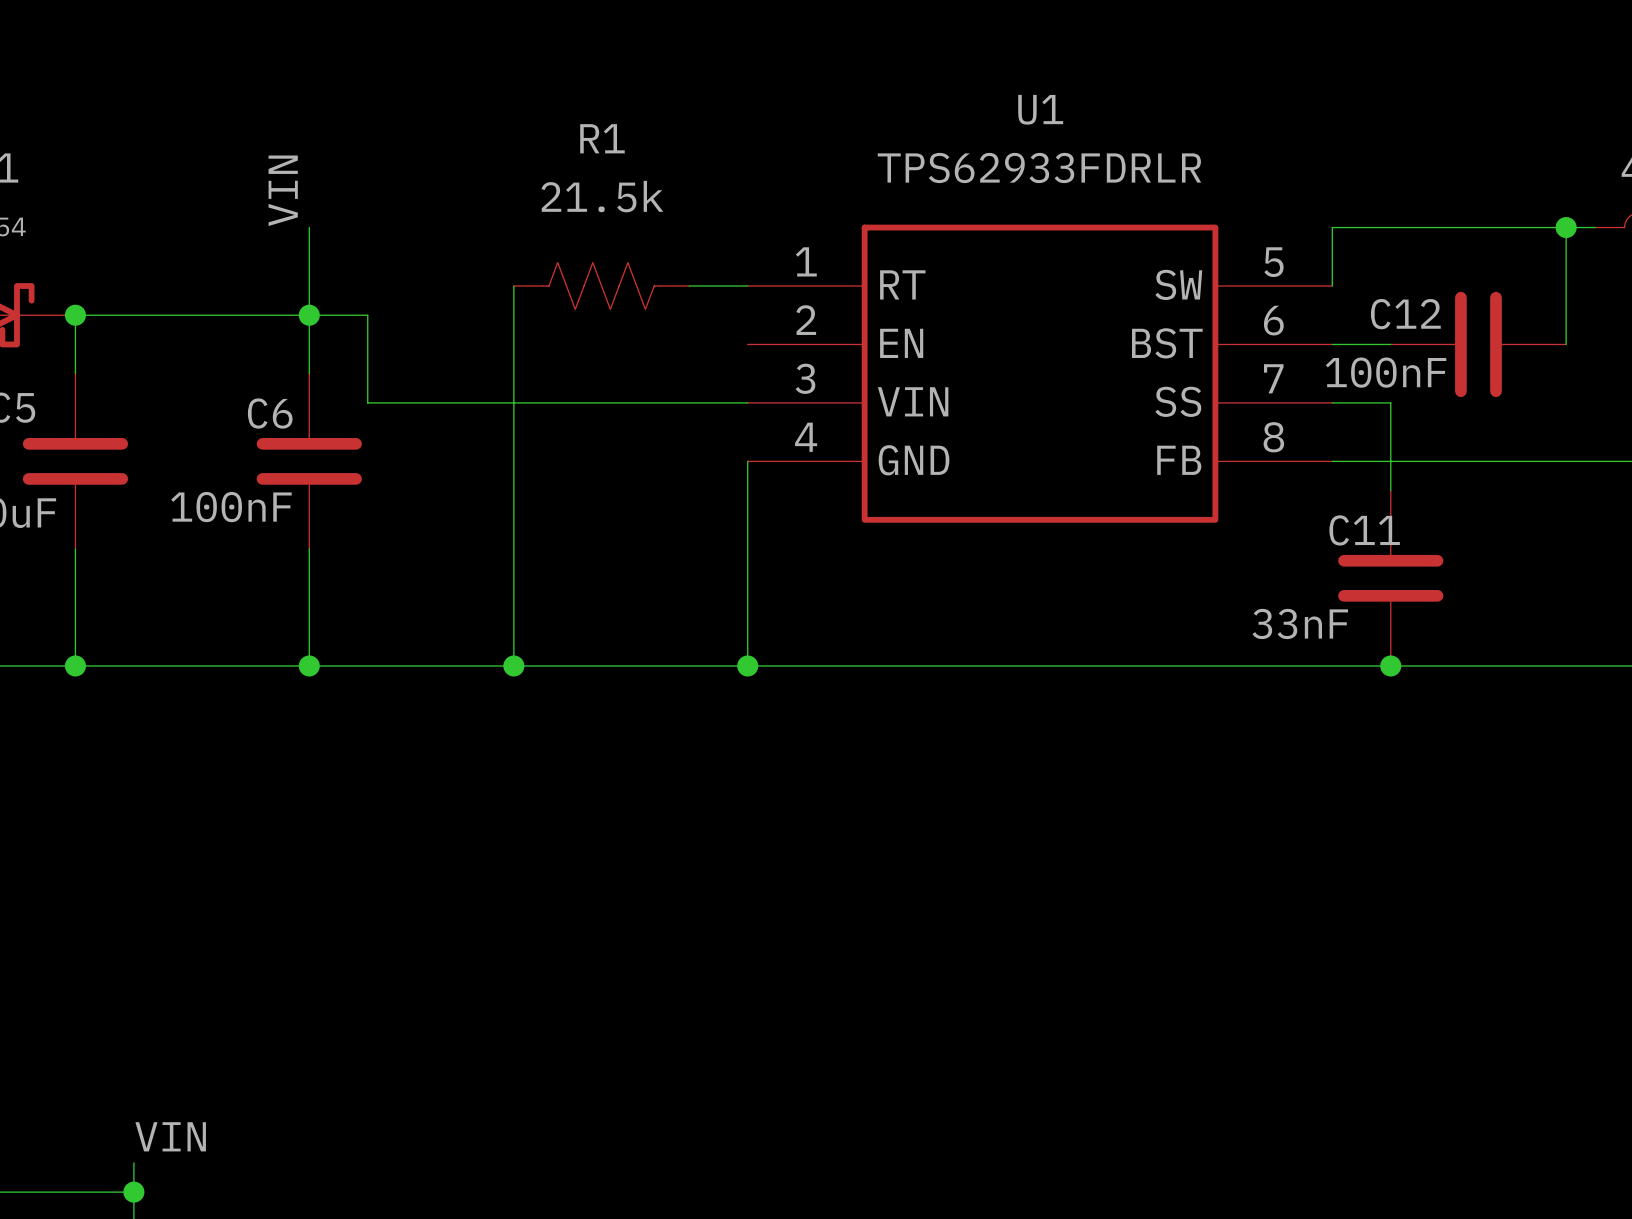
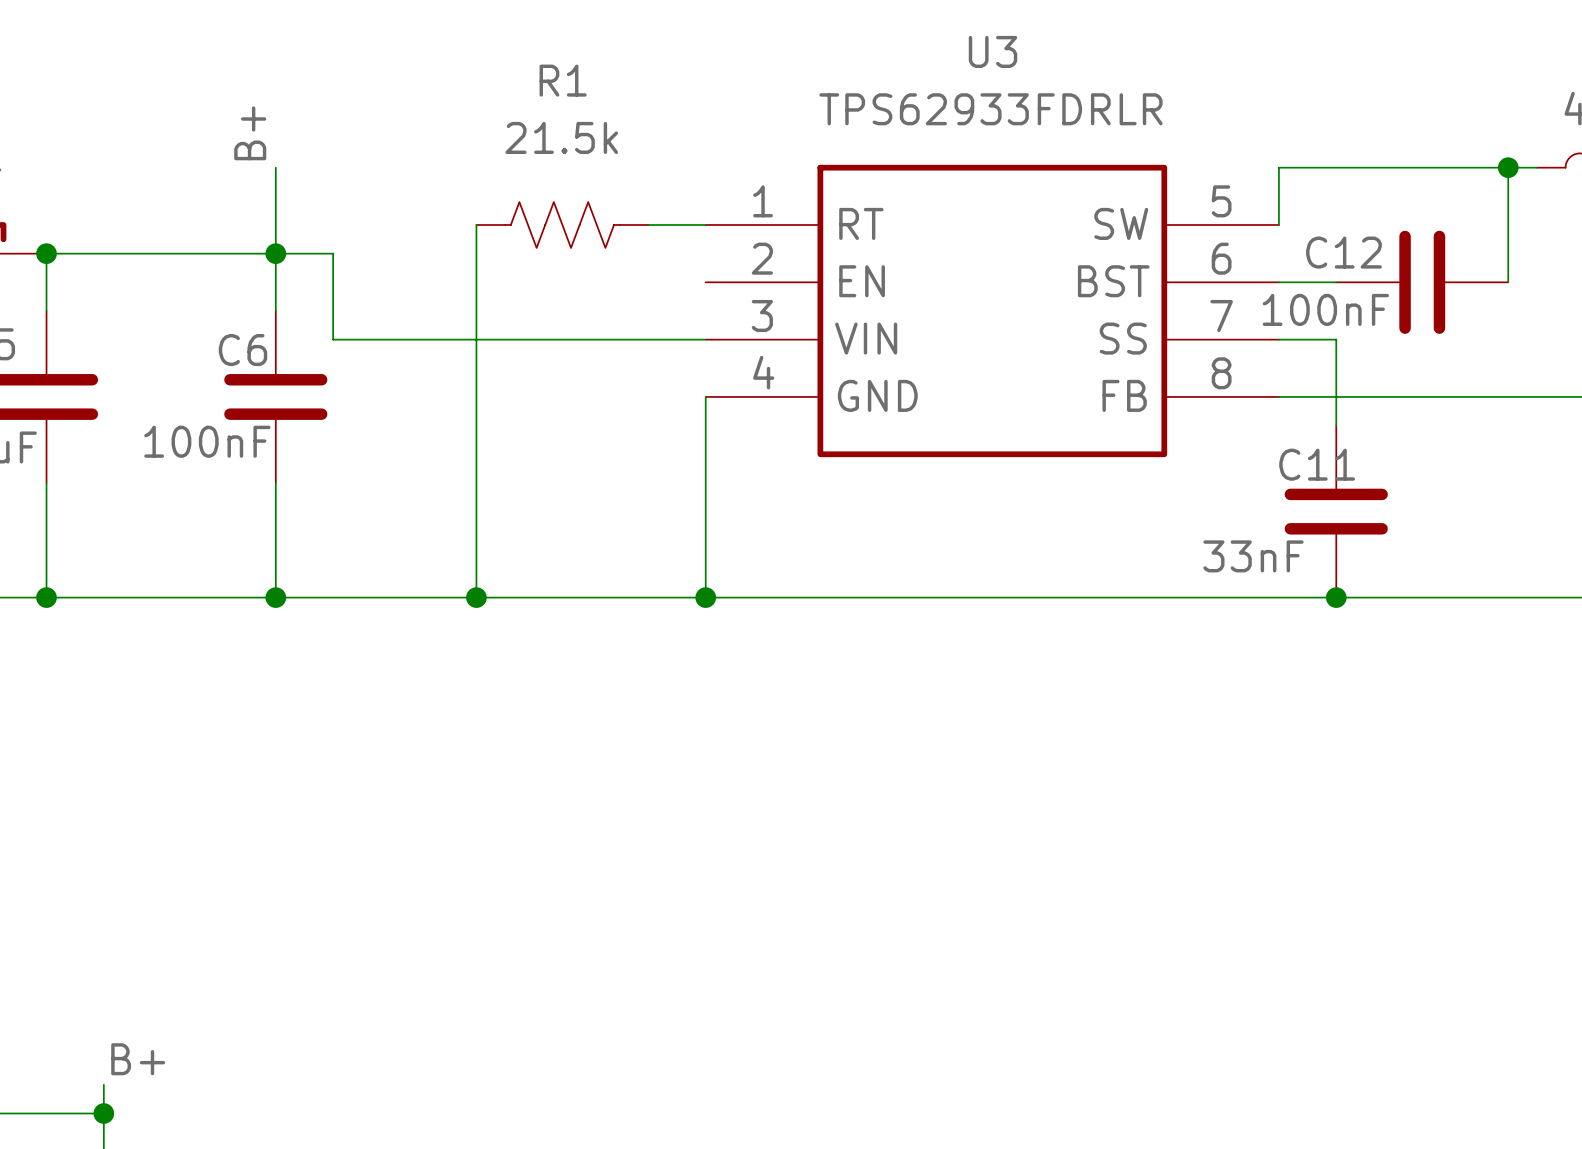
U1 name: U1 (1040, 109) -> U3 (993, 51)
label: VIN (283, 190) -> B+ (250, 133)
label: VIN (170, 1136) -> B+ (138, 1059)

